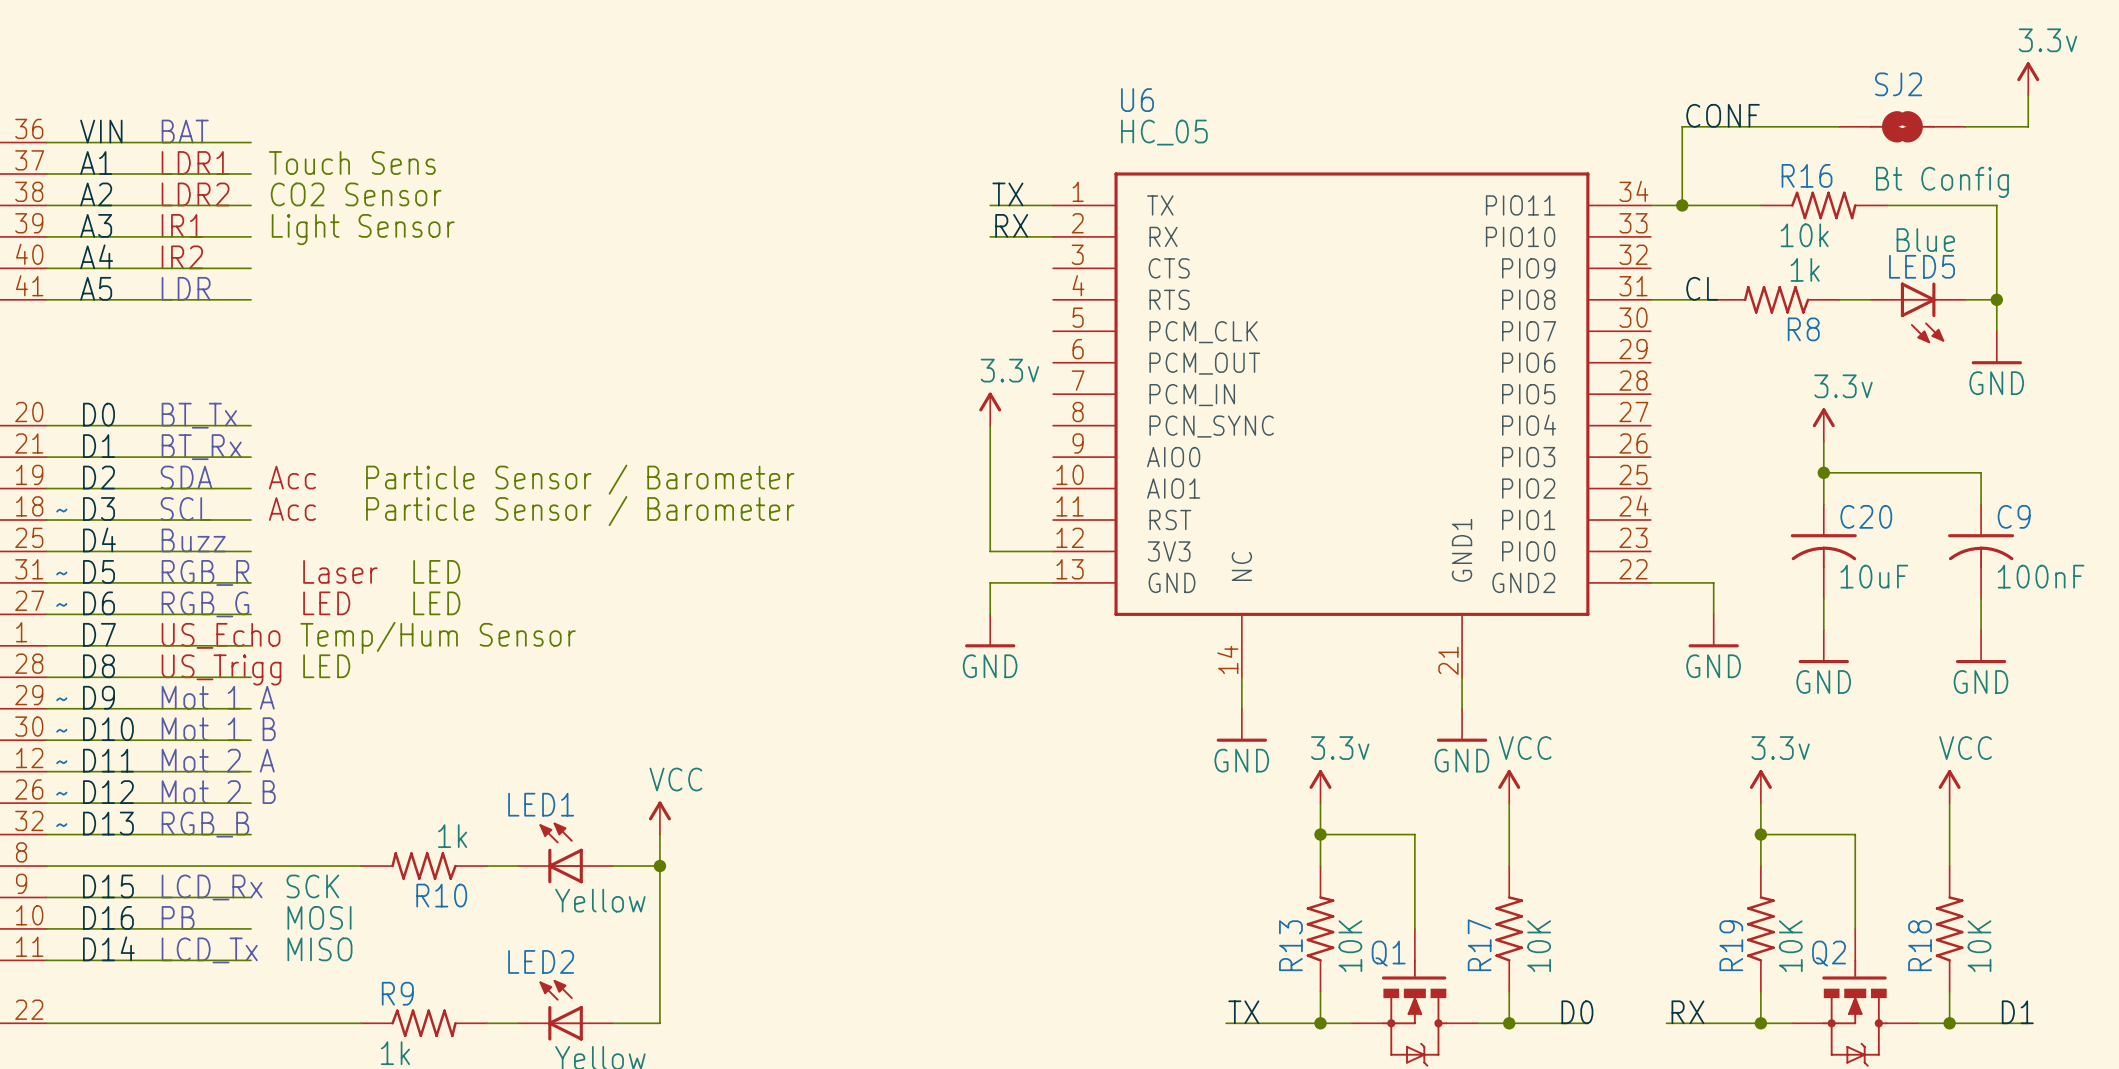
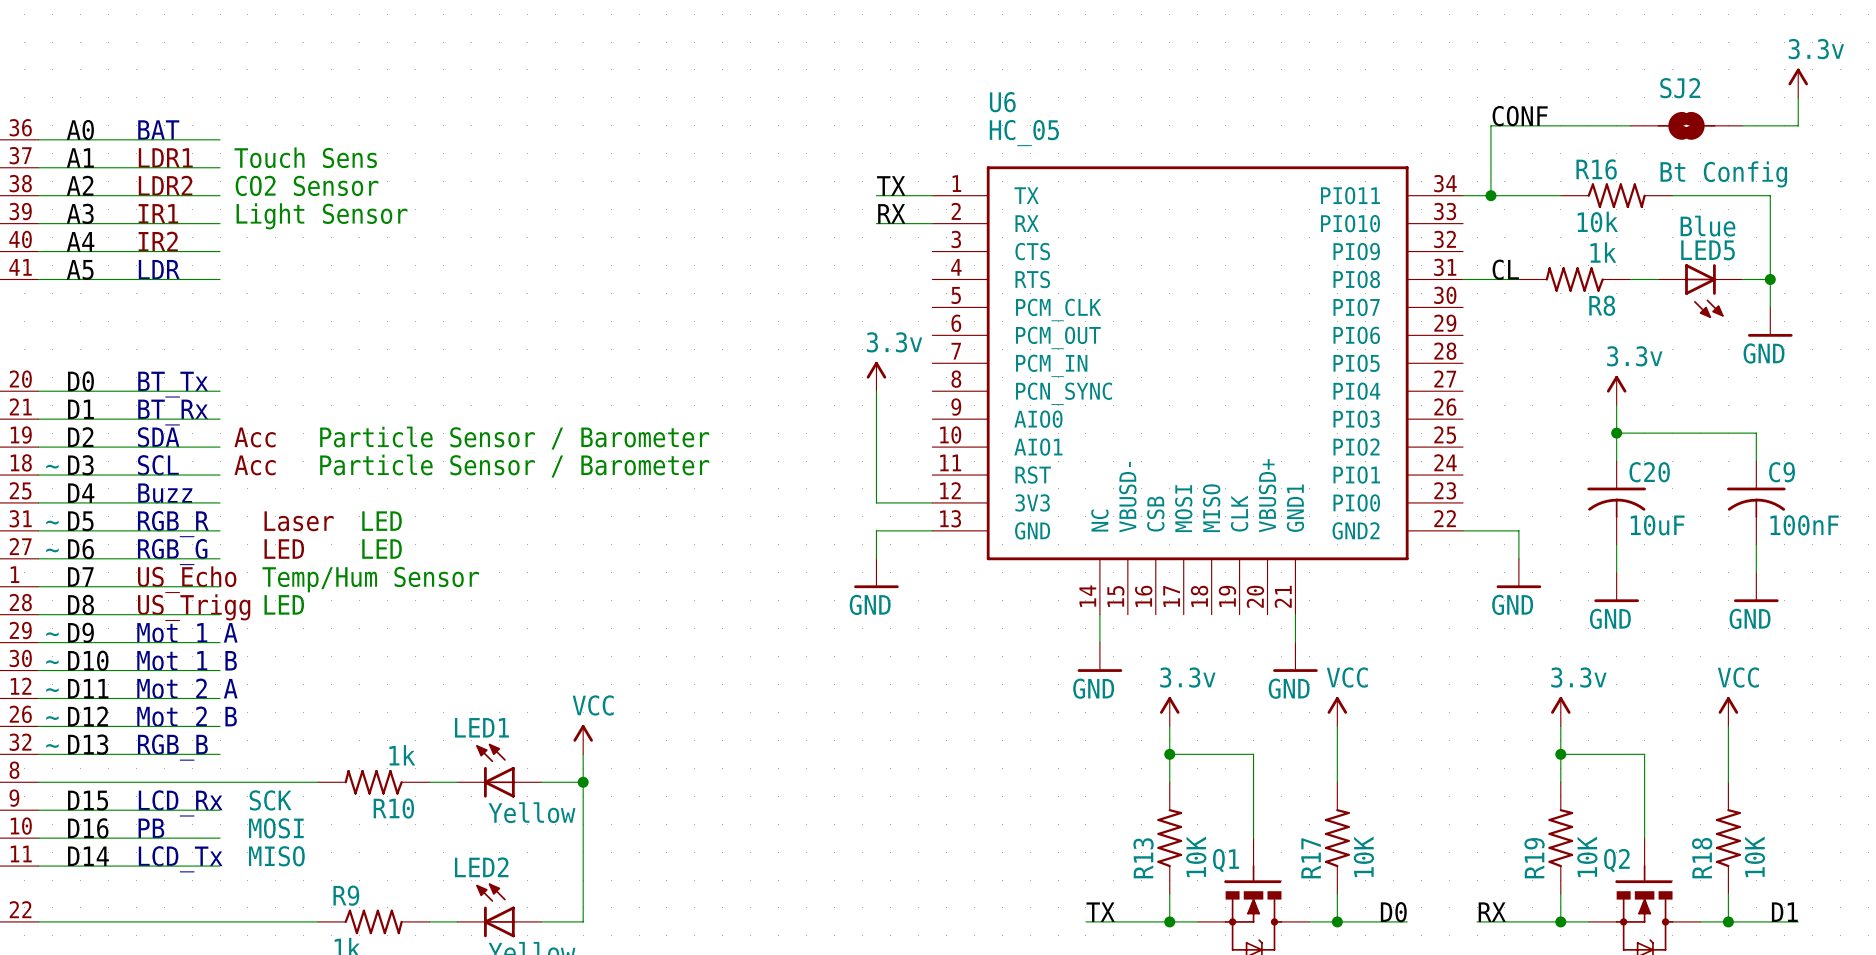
label: VIN (101, 131) -> A0 (80, 130)
U6 symbol: [1053, 172, 1651, 678] -> [932, 166, 1464, 615]

